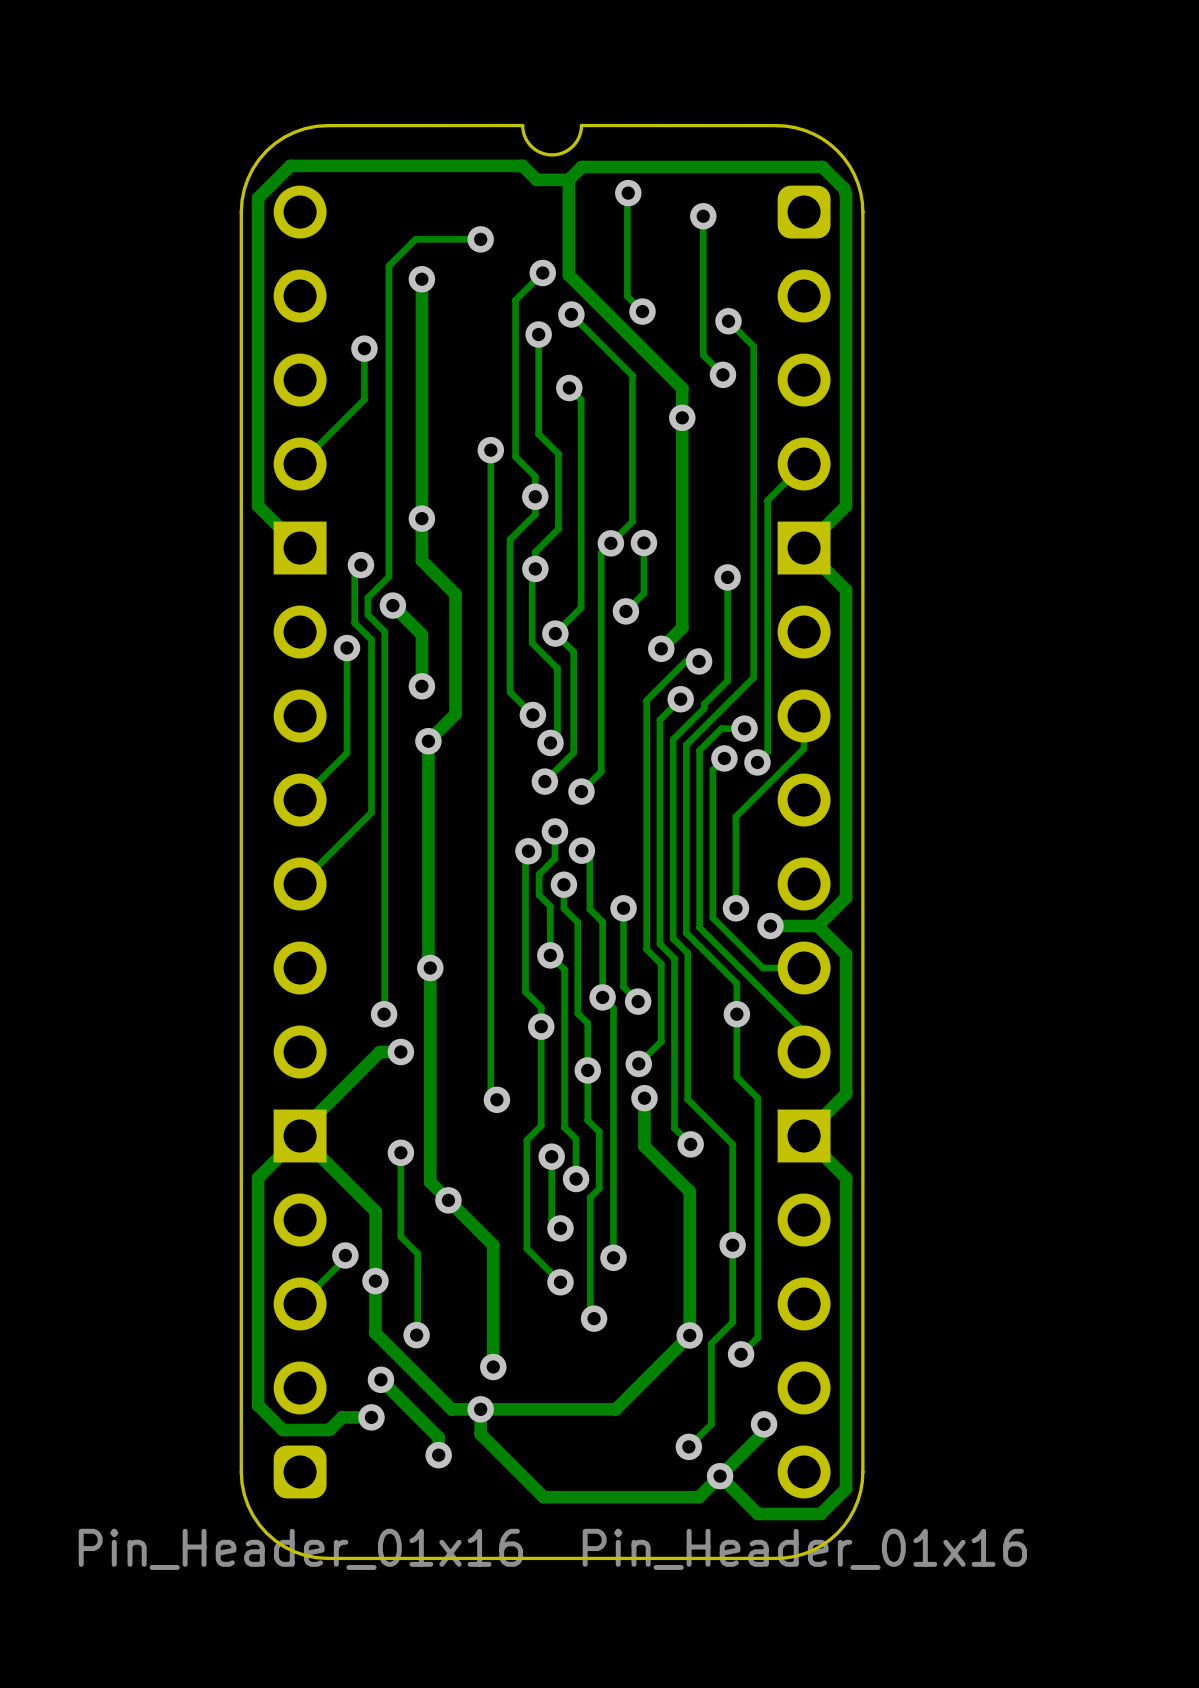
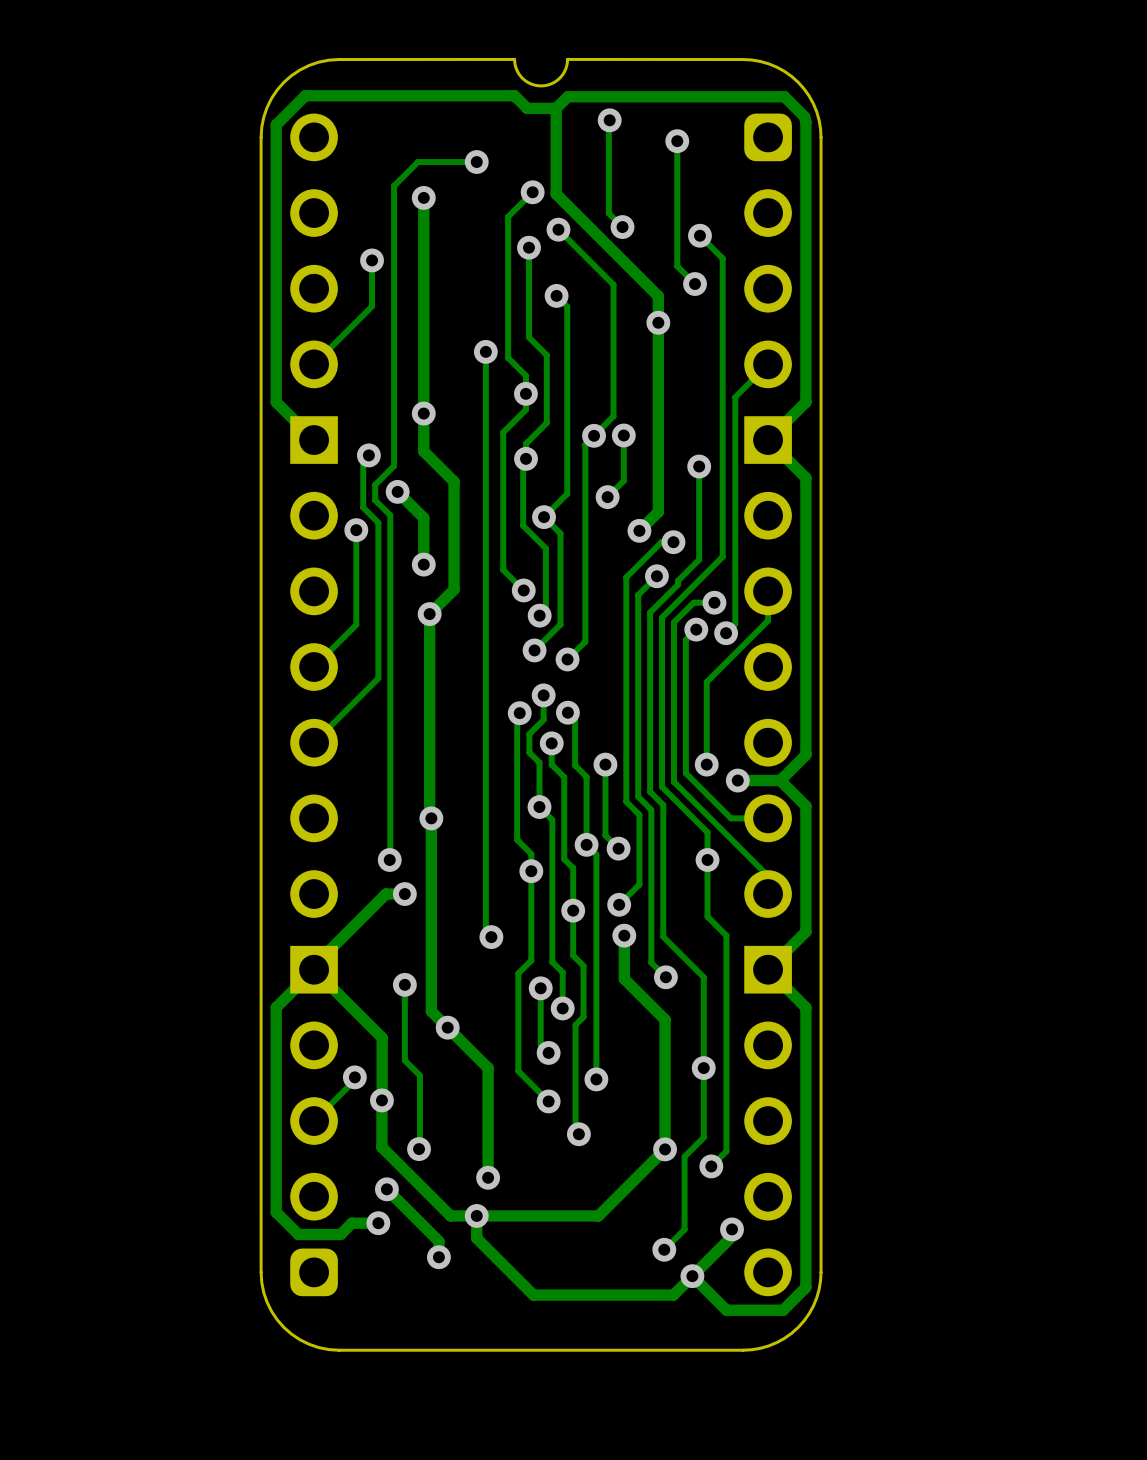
drawing: [78, 1528, 1028, 1570] -> none

